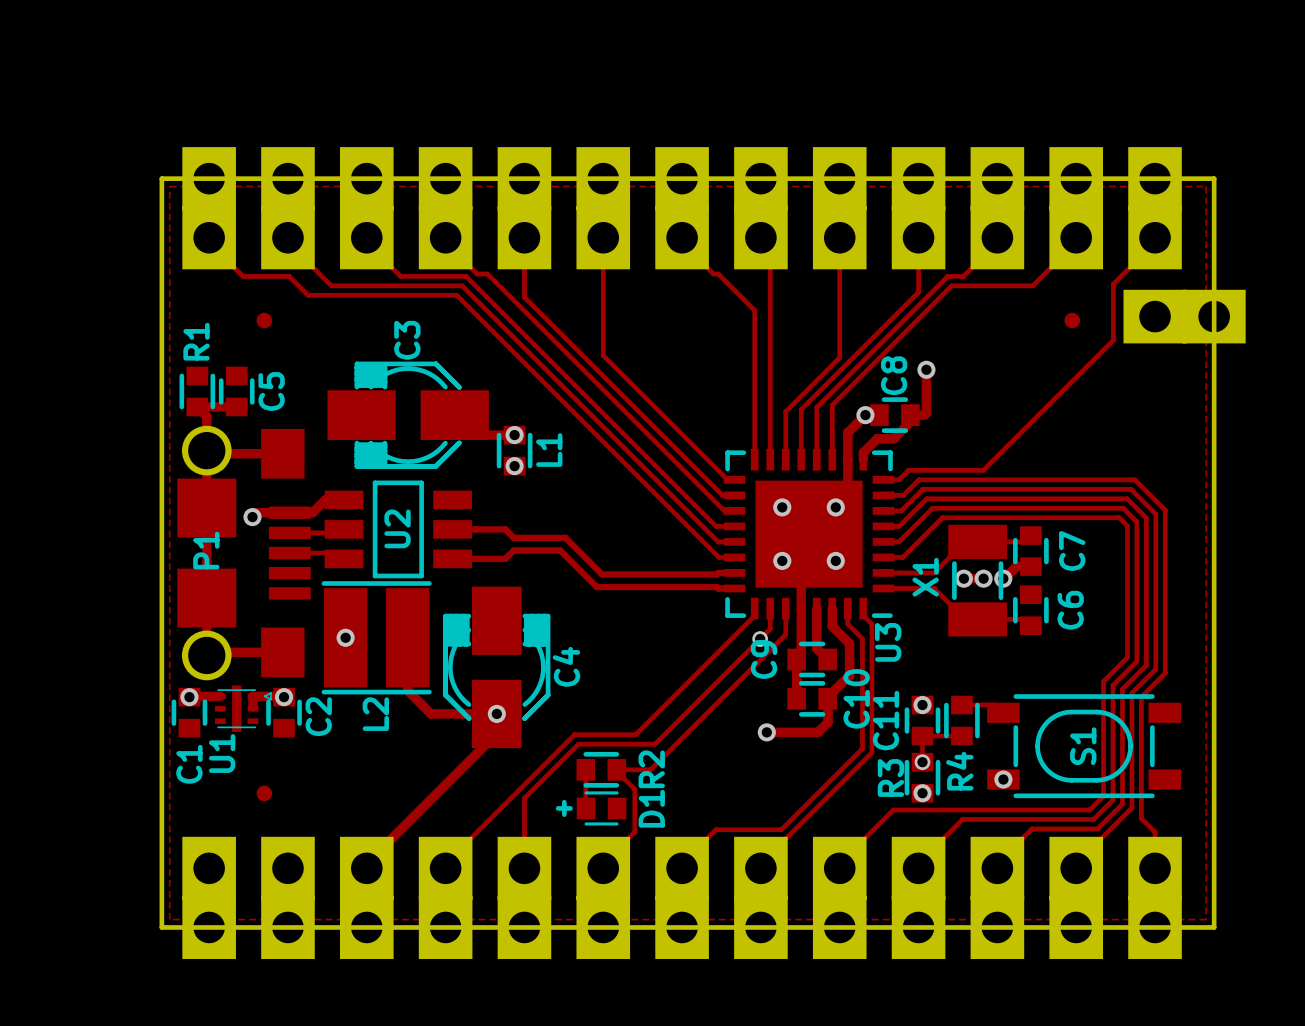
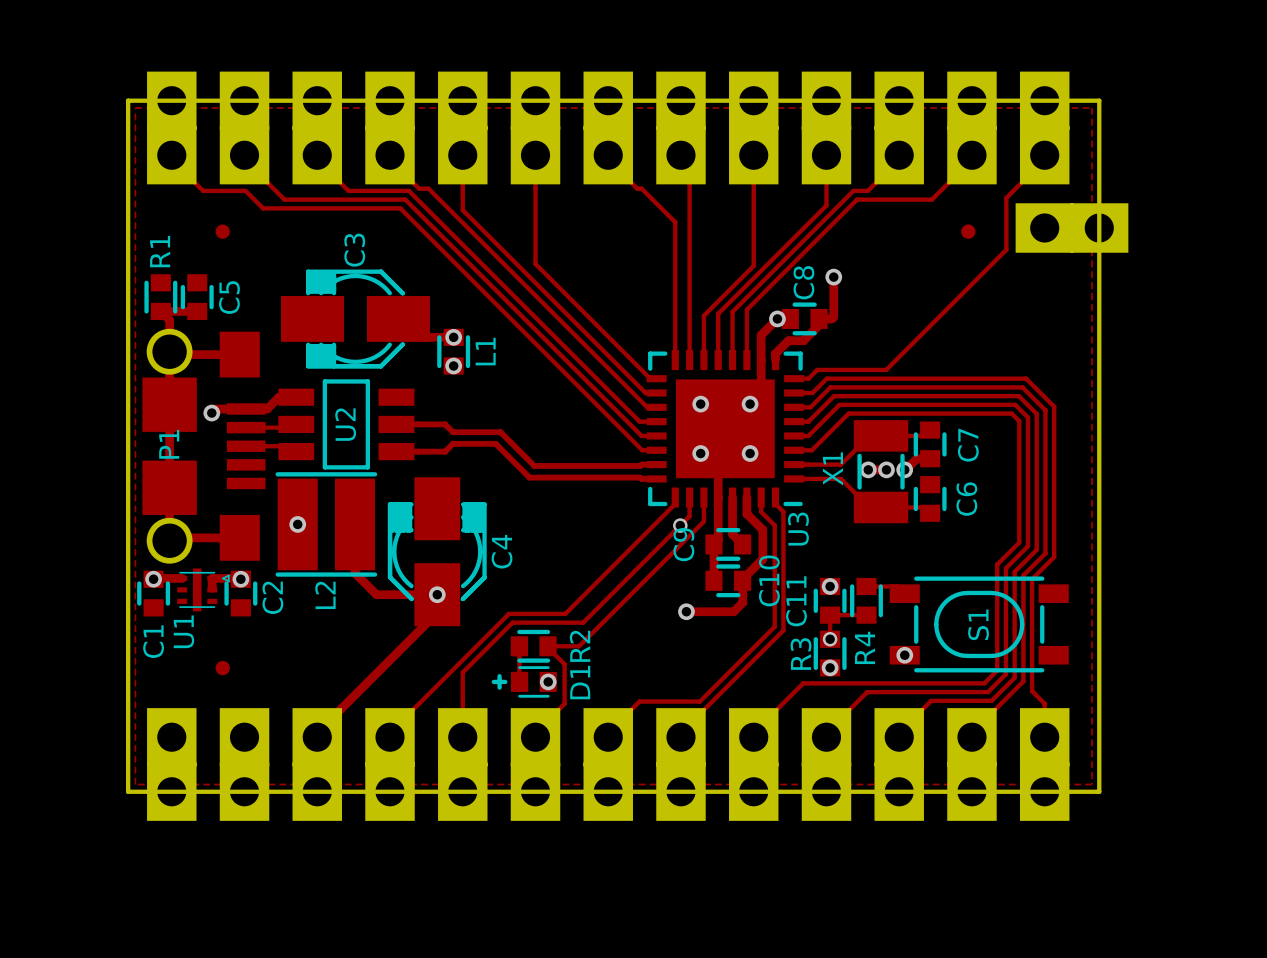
via: none -> (548, 681)

